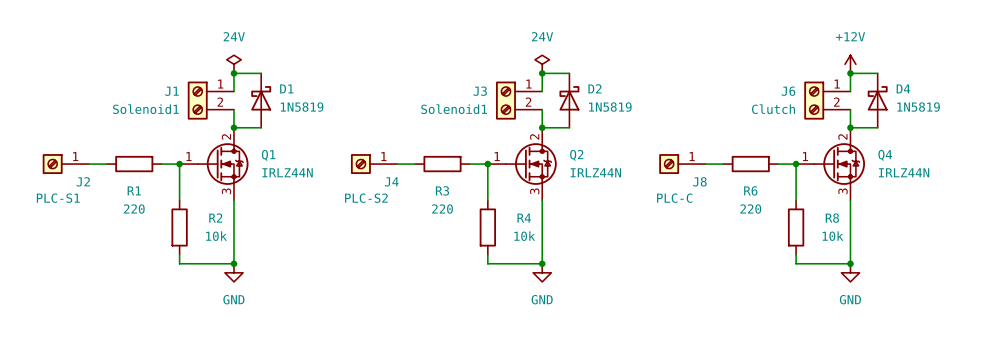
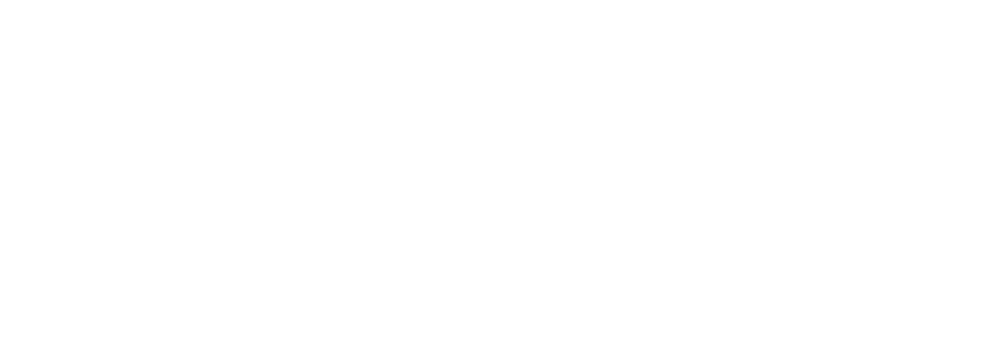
power symbol: 24V (233, 64) -> none
power symbol: 24V (542, 64) -> none
power symbol: +12V (850, 64) -> none
junction: (233, 73) -> none
wire: (261, 73) (233, 73) (233, 91) -> none
junction: (542, 73) -> none
wire: (569, 73) (542, 73) (542, 91) -> none
junction: (850, 73) -> none
wire: (877, 73) (850, 73) (850, 91) -> none
J1: Solenoid1 (210, 100) -> none
D1: 1N5819 (261, 100) -> none
J3: Solenoid1 (519, 100) -> none
D2: 1N5819 (569, 100) -> none
J6: Clutch (827, 100) -> none
D4: 1N5819 (877, 100) -> none
wire: (233, 109) (233, 127) (261, 127) -> none
wire: (542, 109) (542, 127) (569, 127) -> none
wire: (850, 109) (850, 127) (877, 127) -> none
junction: (233, 127) -> none
junction: (542, 127) -> none
junction: (850, 127) -> none
J2: PLC-S1 (65, 164) -> none
wire: (88, 164) (107, 164) -> none
R1: 220 (134, 164) -> none
wire: (161, 164) (179, 164) (179, 200) -> none
junction: (179, 164) -> none
Q1: IRLZ44N (214, 164) -> none
J4: PLC-S2 (374, 164) -> none
wire: (397, 164) (415, 164) -> none
R3: 220 (442, 164) -> none
wire: (469, 164) (487, 164) (487, 200) -> none
junction: (487, 164) -> none
Q2: IRLZ44N (522, 164) -> none
J8: PLC-C (682, 164) -> none
wire: (705, 164) (723, 164) -> none
R6: 220 (750, 164) -> none
wire: (777, 164) (796, 164) (796, 200) -> none
junction: (796, 164) -> none
Q4: IRLZ44N (830, 164) -> none
wire: (233, 200) (233, 263) (179, 263) (179, 254) -> none
wire: (542, 200) (542, 263) (487, 263) (487, 254) -> none
wire: (850, 200) (850, 263) (796, 263) (796, 254) -> none
R2: 10k (179, 227) -> none
R4: 10k (487, 227) -> none
R8: 10k (796, 227) -> none
junction: (233, 263) -> none
junction: (542, 263) -> none
junction: (850, 263) -> none
power symbol: GND (233, 272) -> none
power symbol: GND (542, 272) -> none
power symbol: GND (850, 272) -> none

